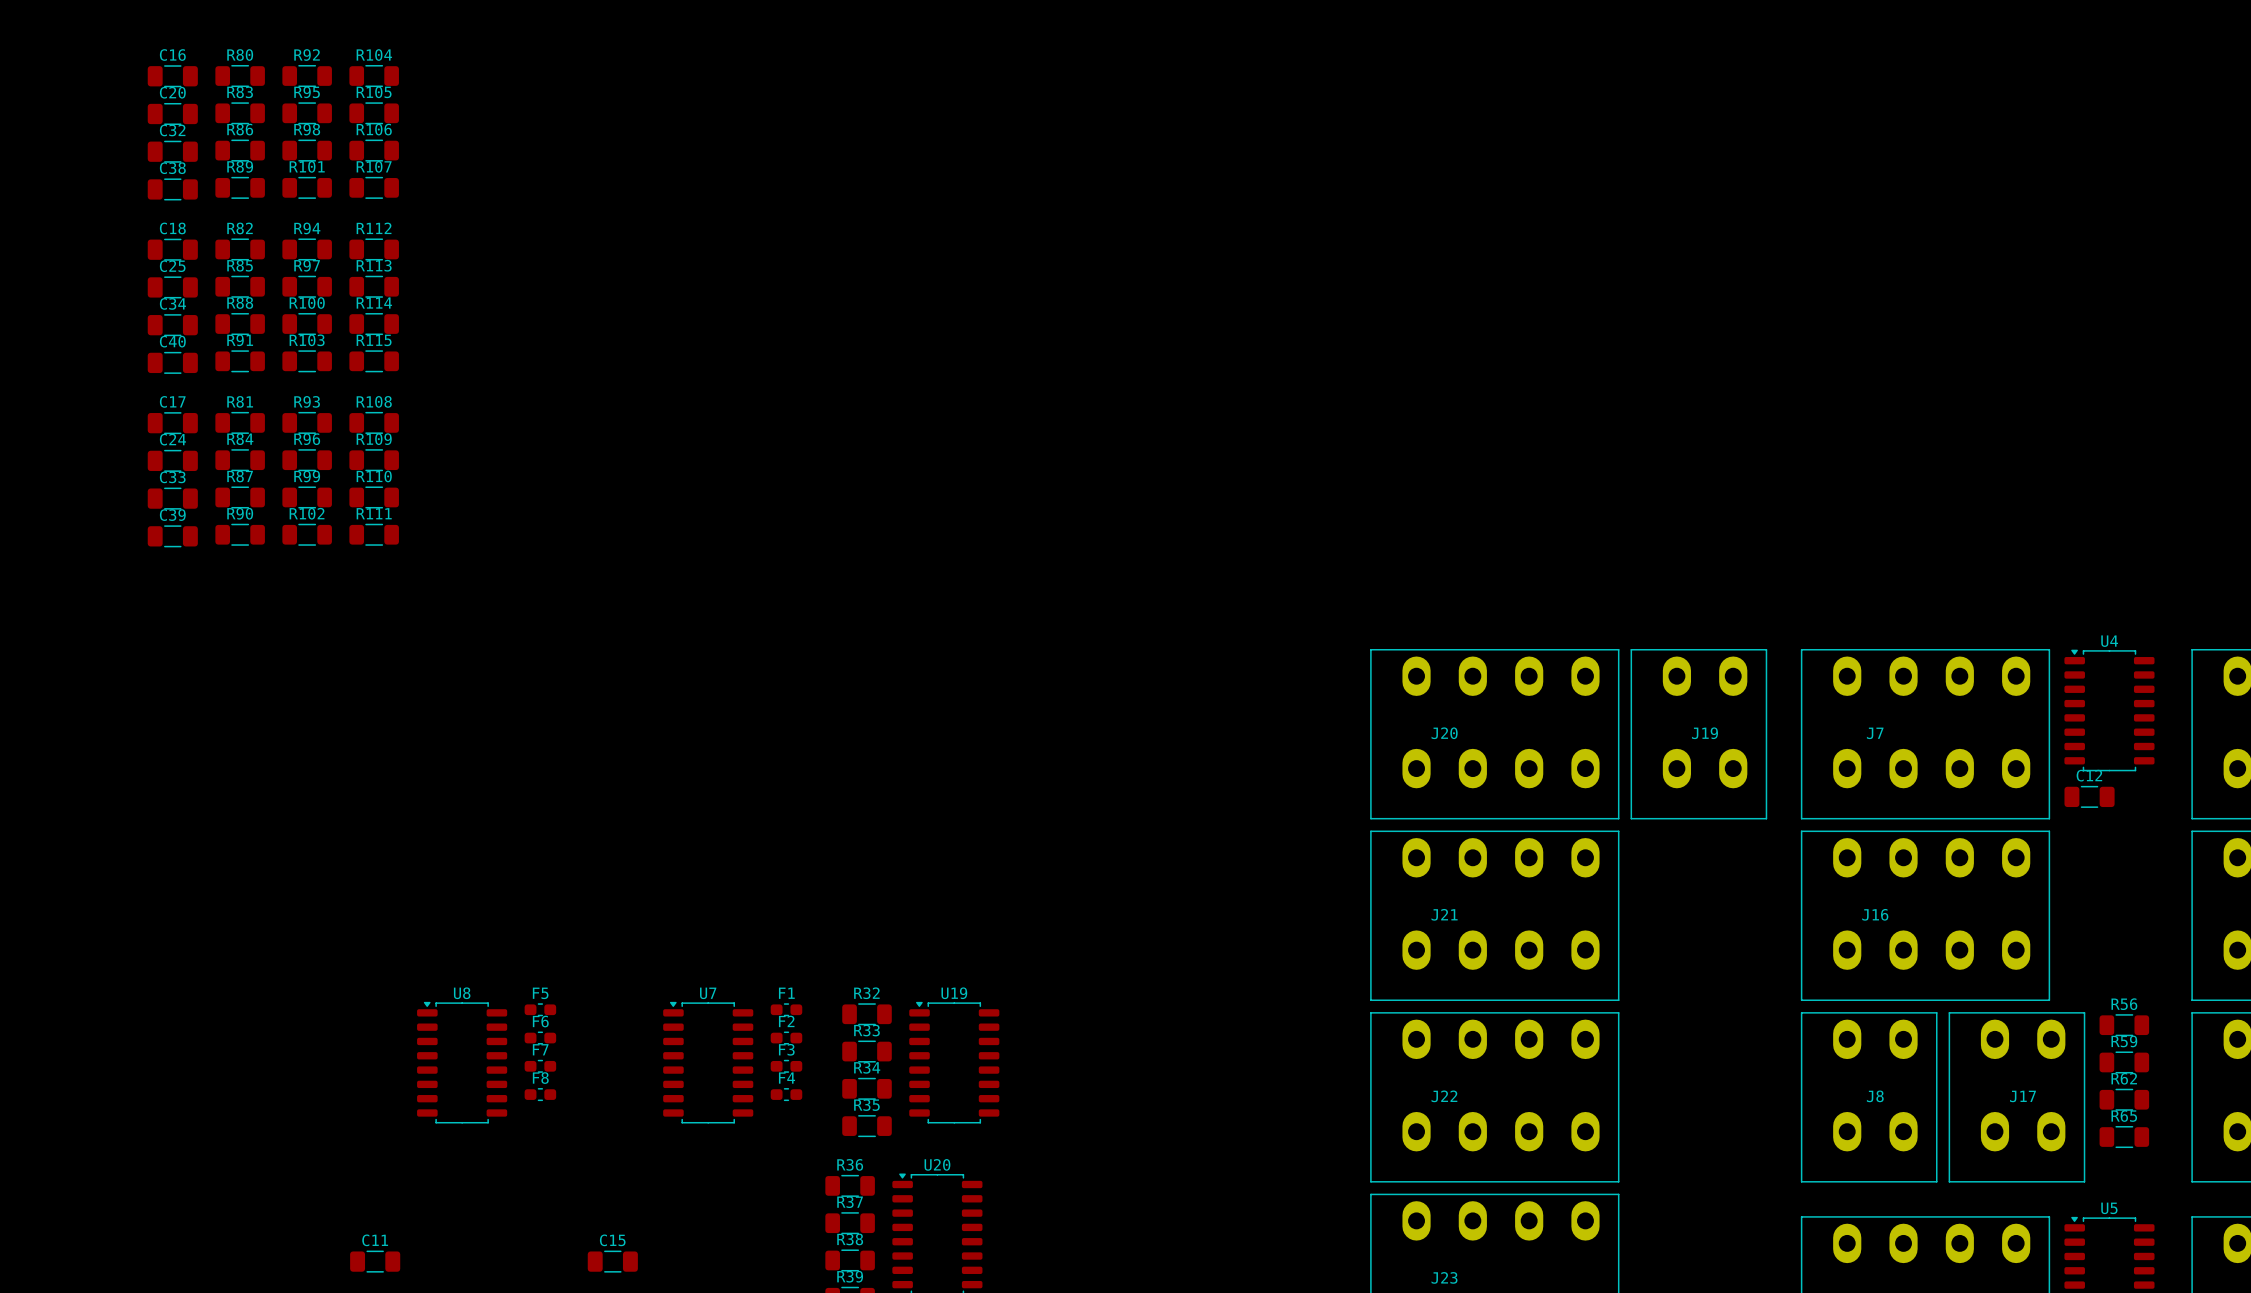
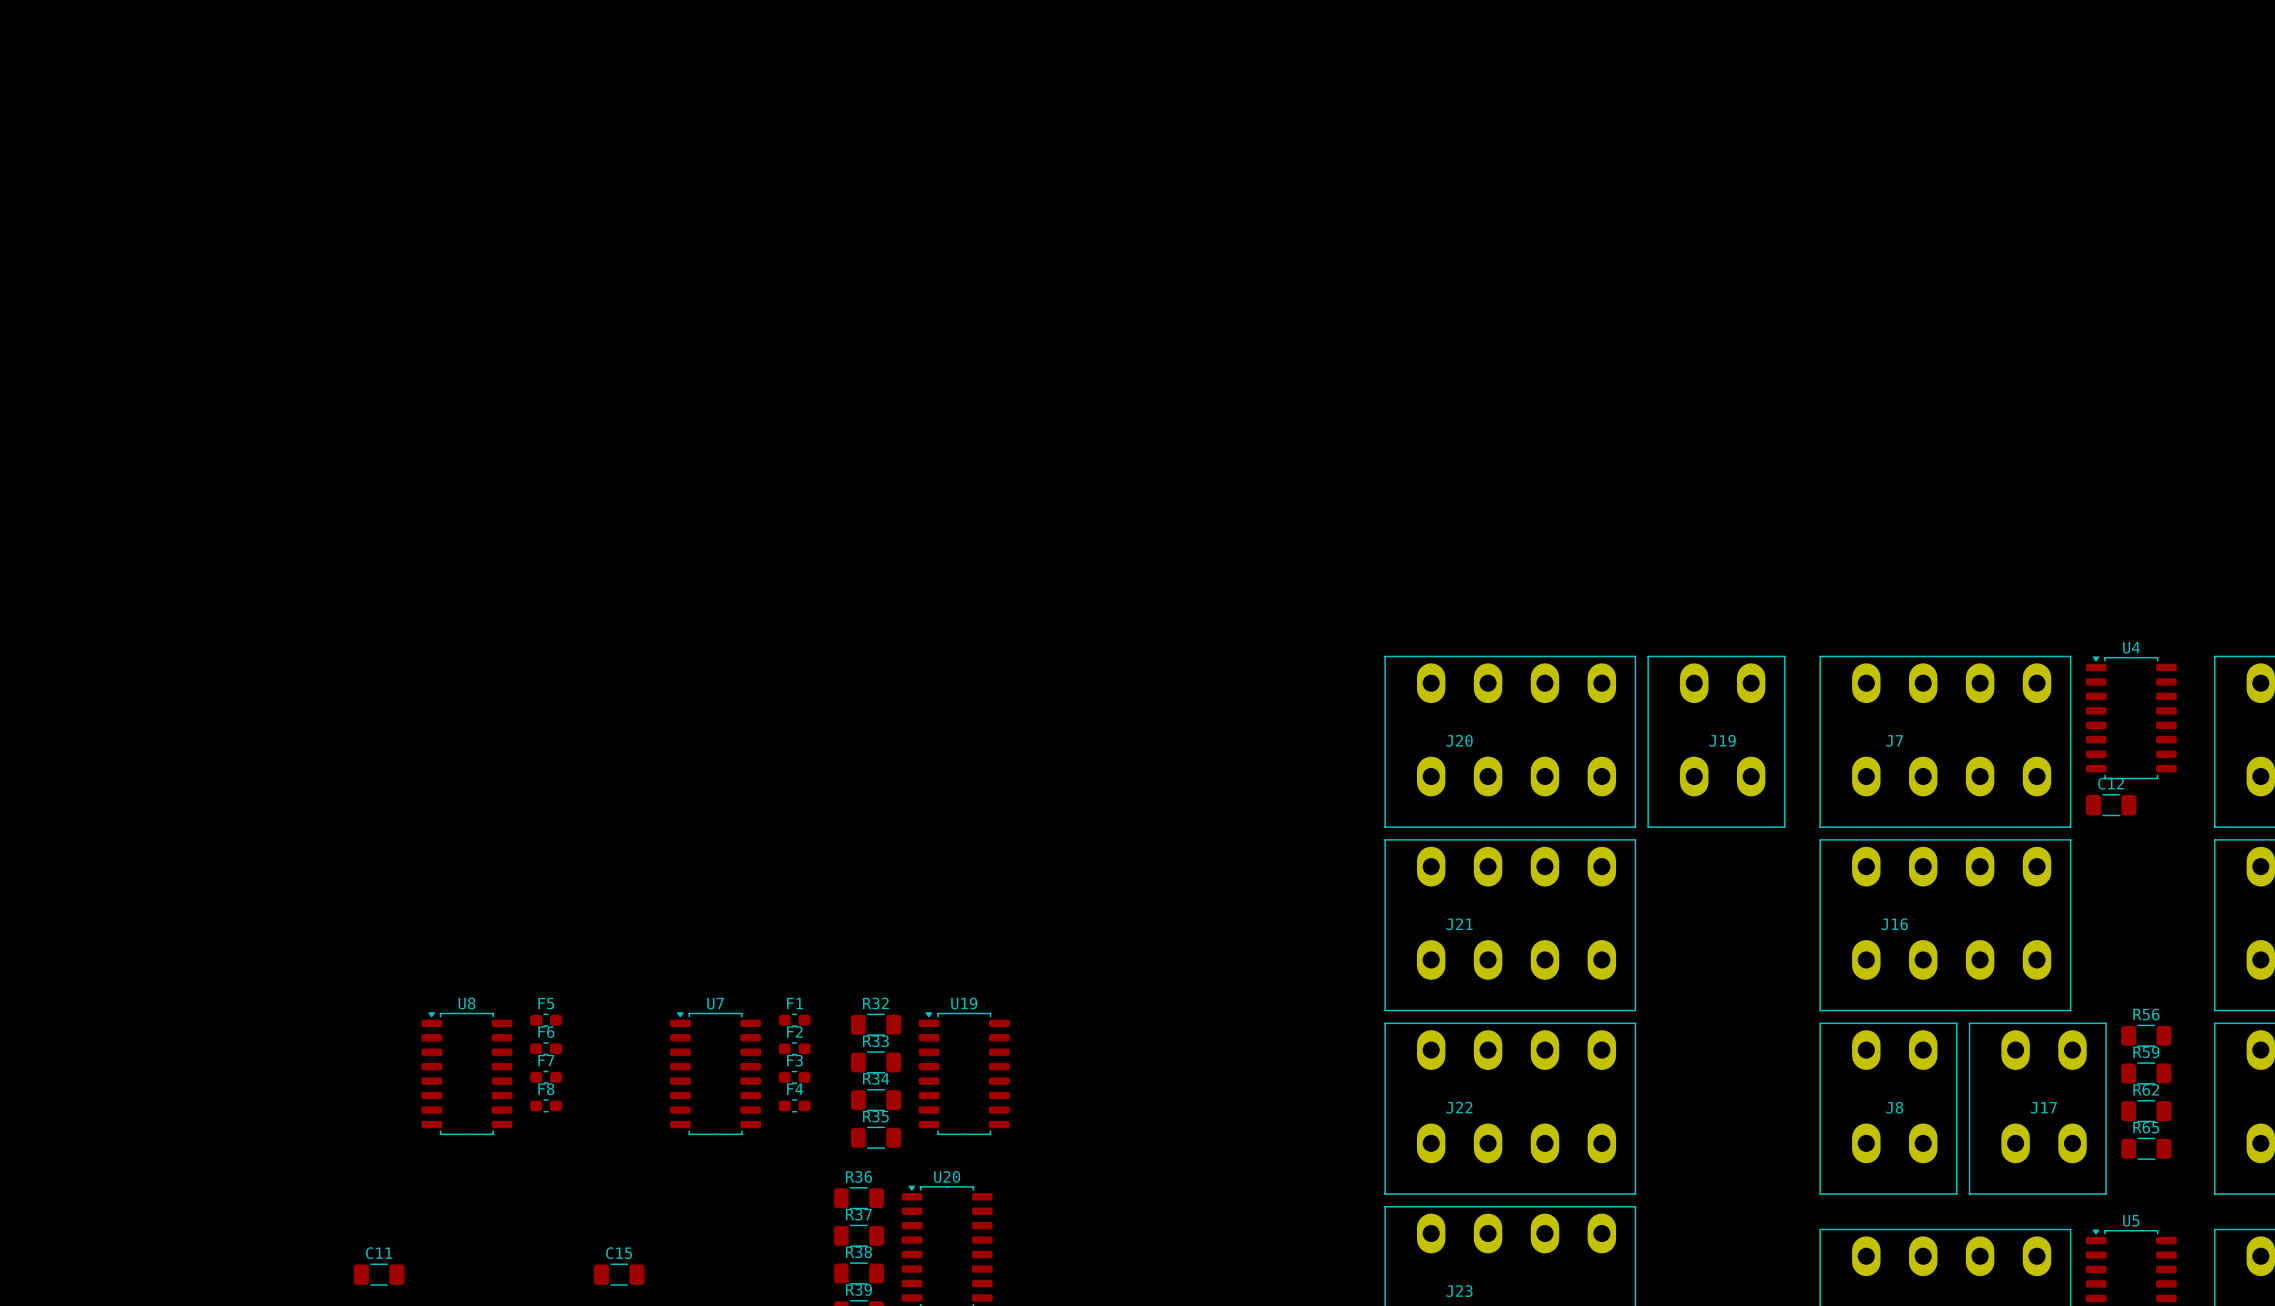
C16: (172, 76) -> none
R80: (240, 76) -> none
R92: (307, 76) -> none
R104: (374, 76) -> none
C20: (172, 113) -> none
R83: (240, 113) -> none
R95: (307, 113) -> none
R105: (374, 113) -> none
R86: (240, 150) -> none
R98: (307, 150) -> none
R106: (374, 150) -> none
C32: (172, 151) -> none
R89: (240, 187) -> none
R101: (307, 187) -> none
R107: (374, 187) -> none
C38: (172, 189) -> none
C18: (172, 249) -> none
R82: (240, 249) -> none
R94: (307, 249) -> none
R112: (374, 249) -> none
R85: (240, 286) -> none
R97: (307, 286) -> none
R113: (374, 286) -> none
C25: (172, 287) -> none
R88: (240, 324) -> none
R100: (307, 324) -> none
R114: (374, 324) -> none
C34: (172, 325) -> none
R91: (240, 361) -> none
R103: (307, 361) -> none
R115: (374, 361) -> none
C40: (172, 362) -> none
R81: (240, 422) -> none
R93: (307, 422) -> none
R108: (374, 422) -> none
C17: (172, 423) -> none
C24: (172, 460) -> none
R84: (240, 460) -> none
R96: (307, 460) -> none
R109: (374, 460) -> none
R87: (240, 497) -> none
R99: (307, 497) -> none
R110: (374, 497) -> none
C33: (172, 498) -> none
R90: (240, 534) -> none
R102: (307, 534) -> none
R111: (374, 534) -> none
C39: (172, 536) -> none

